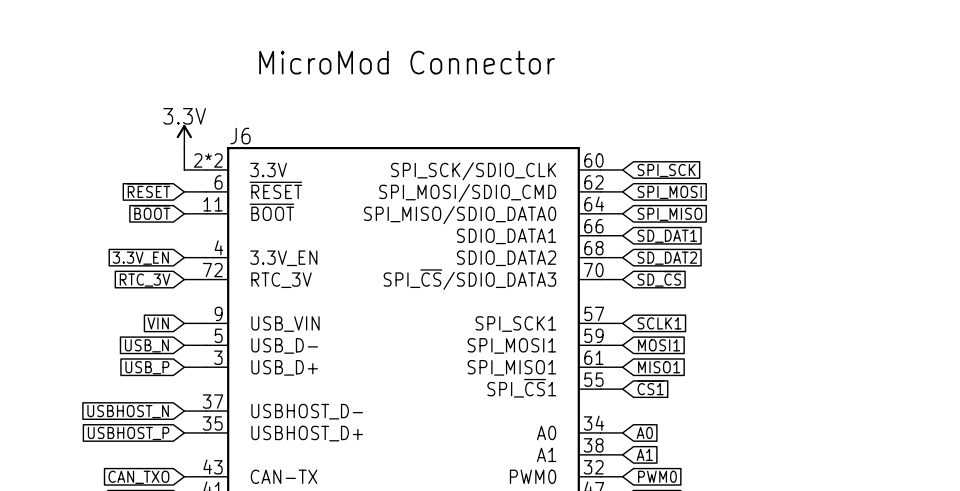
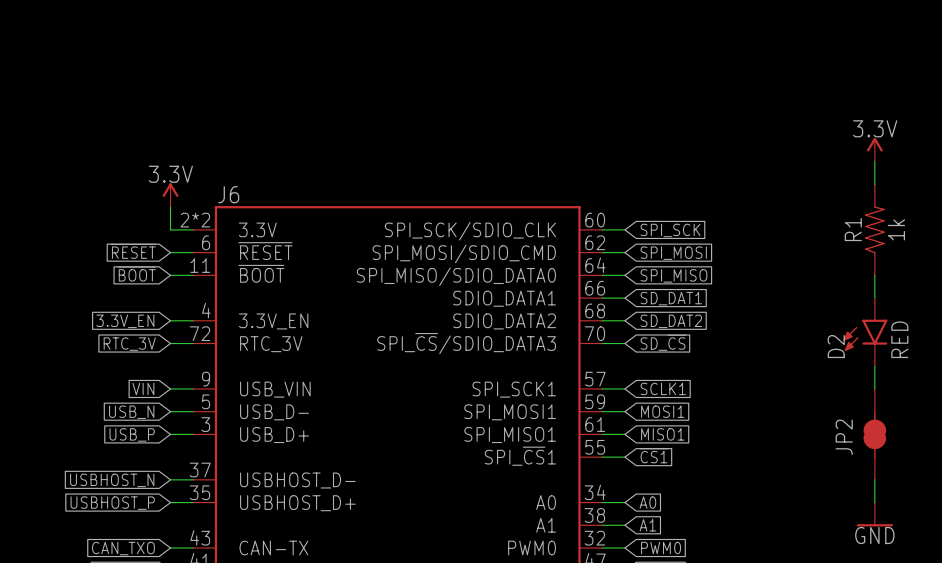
text: MicroMod Connector (407, 62) -> none
power symbol: none -> 3.3V (874, 149)
wire: none -> (874, 161) (874, 184)
R1: none -> 1k (874, 229)
wire: none -> (874, 275) (874, 298)
D2: none -> RED (865, 332)
wire: none -> (874, 366) (874, 388)
JP2: none -> (874, 434)
wire: none -> (874, 479) (874, 502)
power symbol: none -> GND (874, 514)

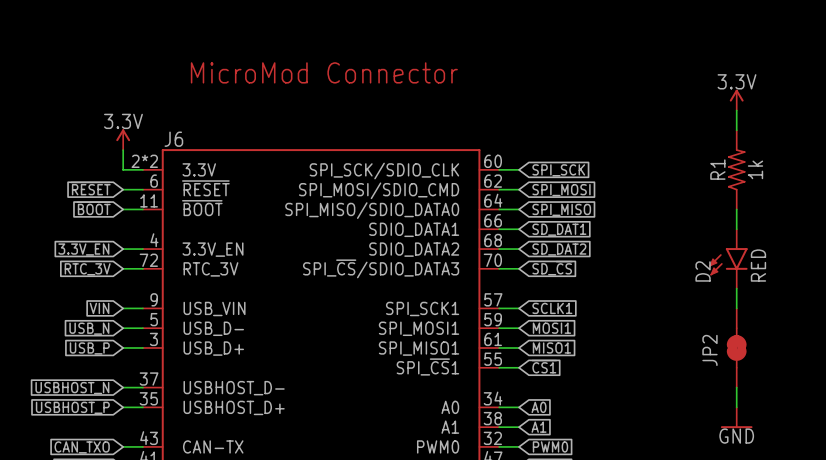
text: none -> MicroMod Connector (324, 72)

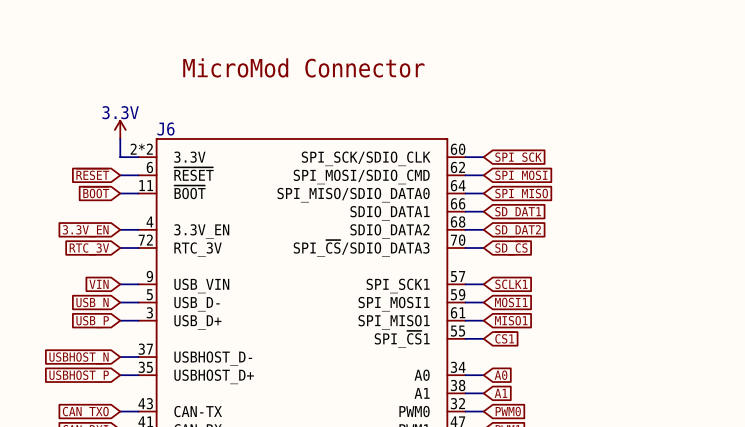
power symbol: 3.3V (736, 100) -> none
wire: (736, 110) (736, 130) -> none
R1: 1k (736, 169) -> none
wire: (736, 209) (736, 229) -> none
D2: RED (728, 258) -> none
wire: (736, 288) (736, 308) -> none
JP2: (736, 348) -> none
wire: (736, 387) (736, 407) -> none
power symbol: GND (736, 417) -> none

